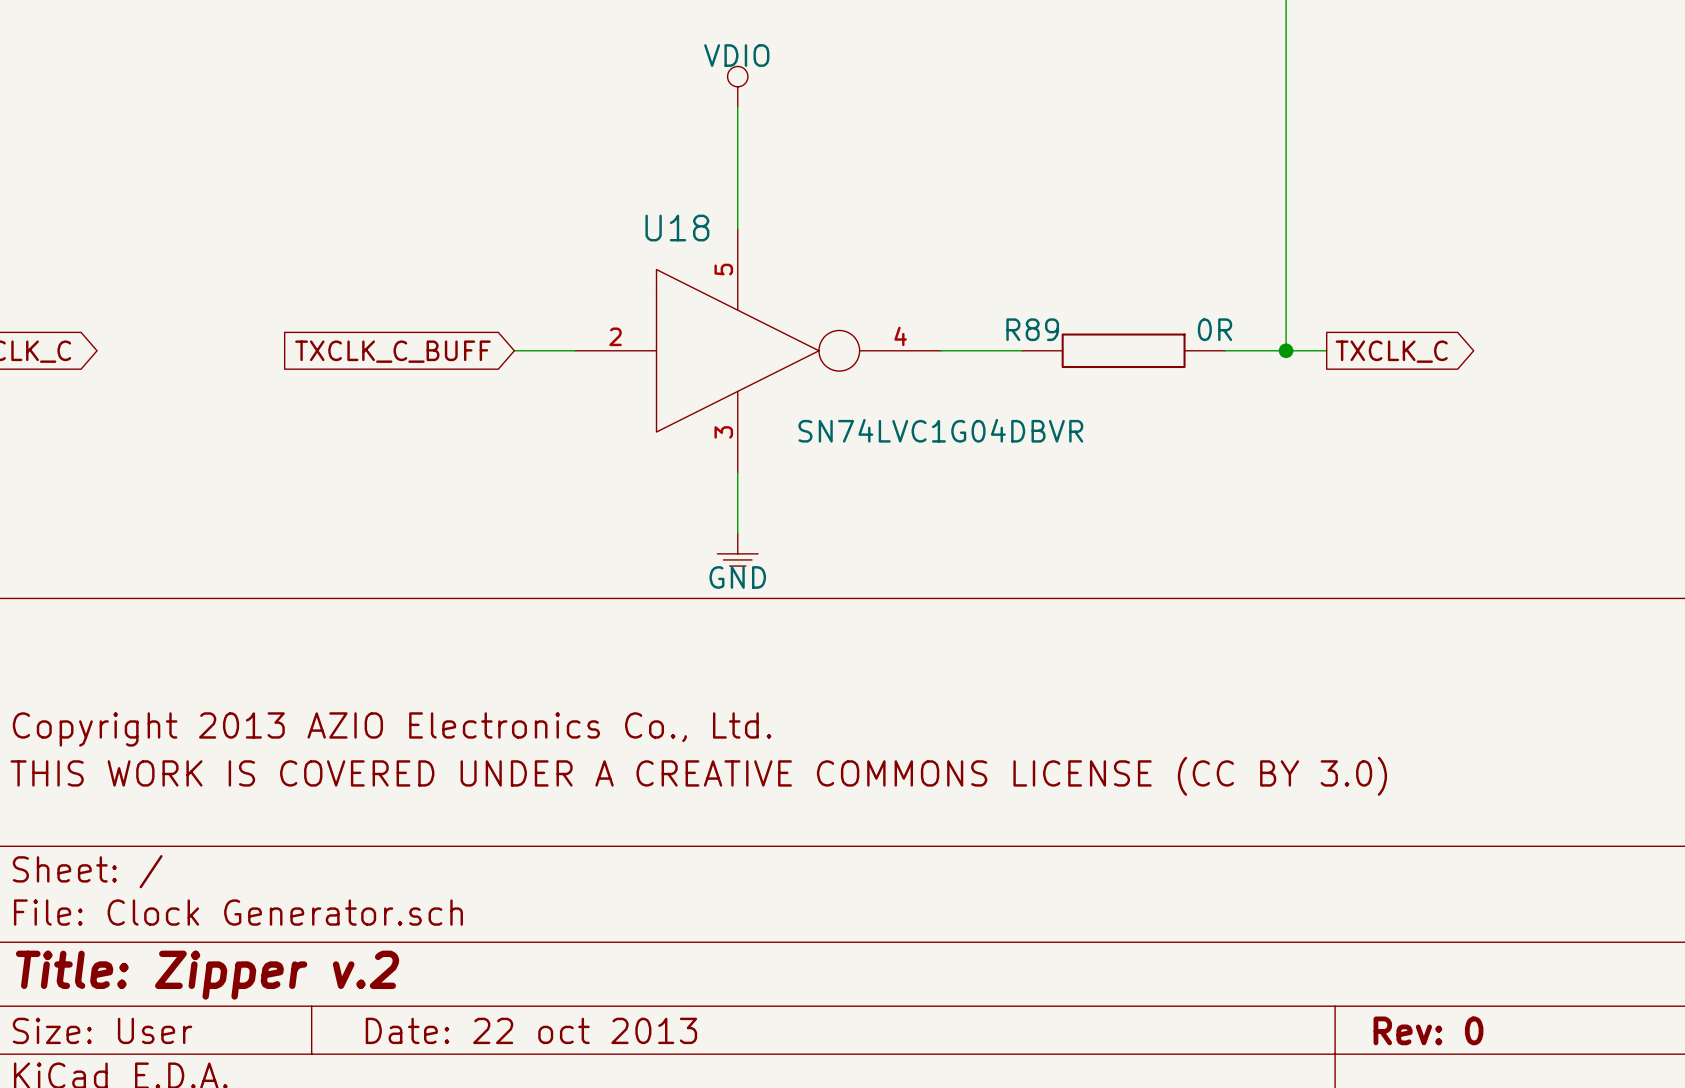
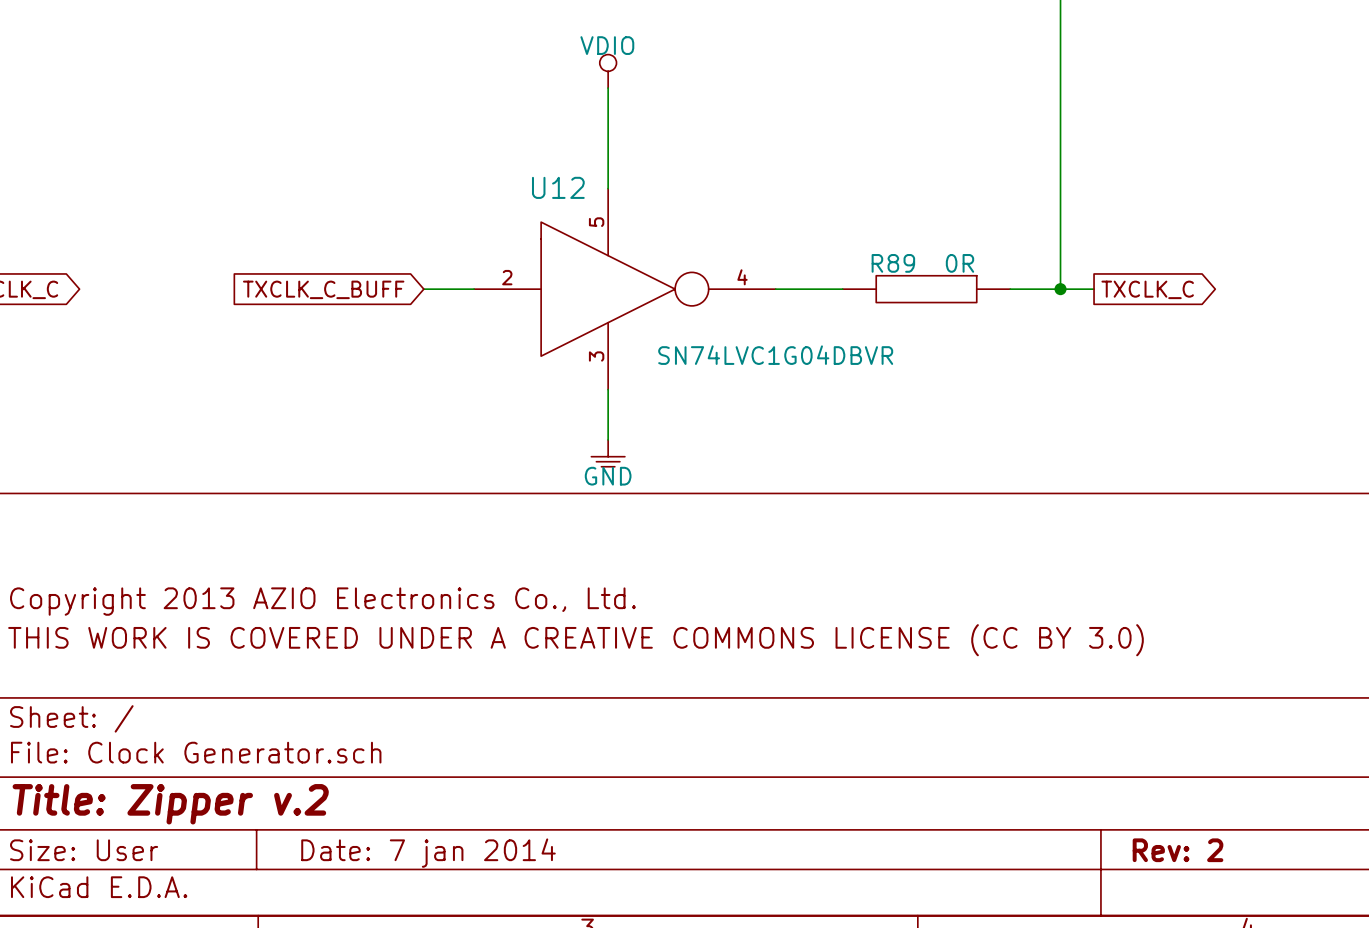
U18 name: U18 (677, 228) -> U12 (558, 187)
R89 name position: R89 (1032, 329) -> R89 (893, 263)
R89 text position: 0R (1215, 329) -> 0R (959, 263)
title block: Date: 22 oct 2013 (531, 1030) -> Date: 7 jan 2014 (428, 853)
title block: Rev: 0 (1428, 1030) -> Rev: 2 (1178, 850)

